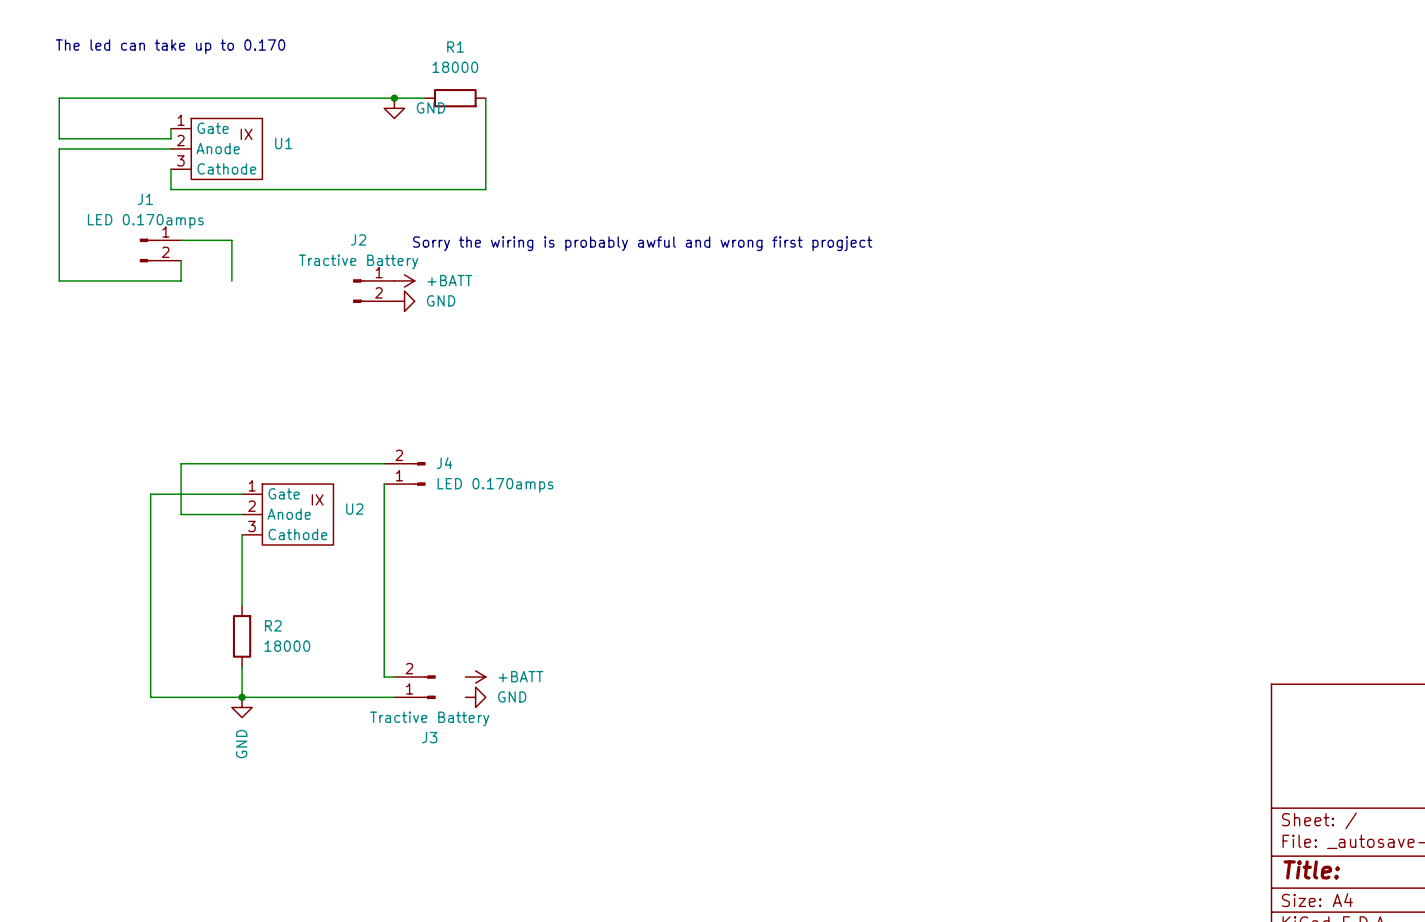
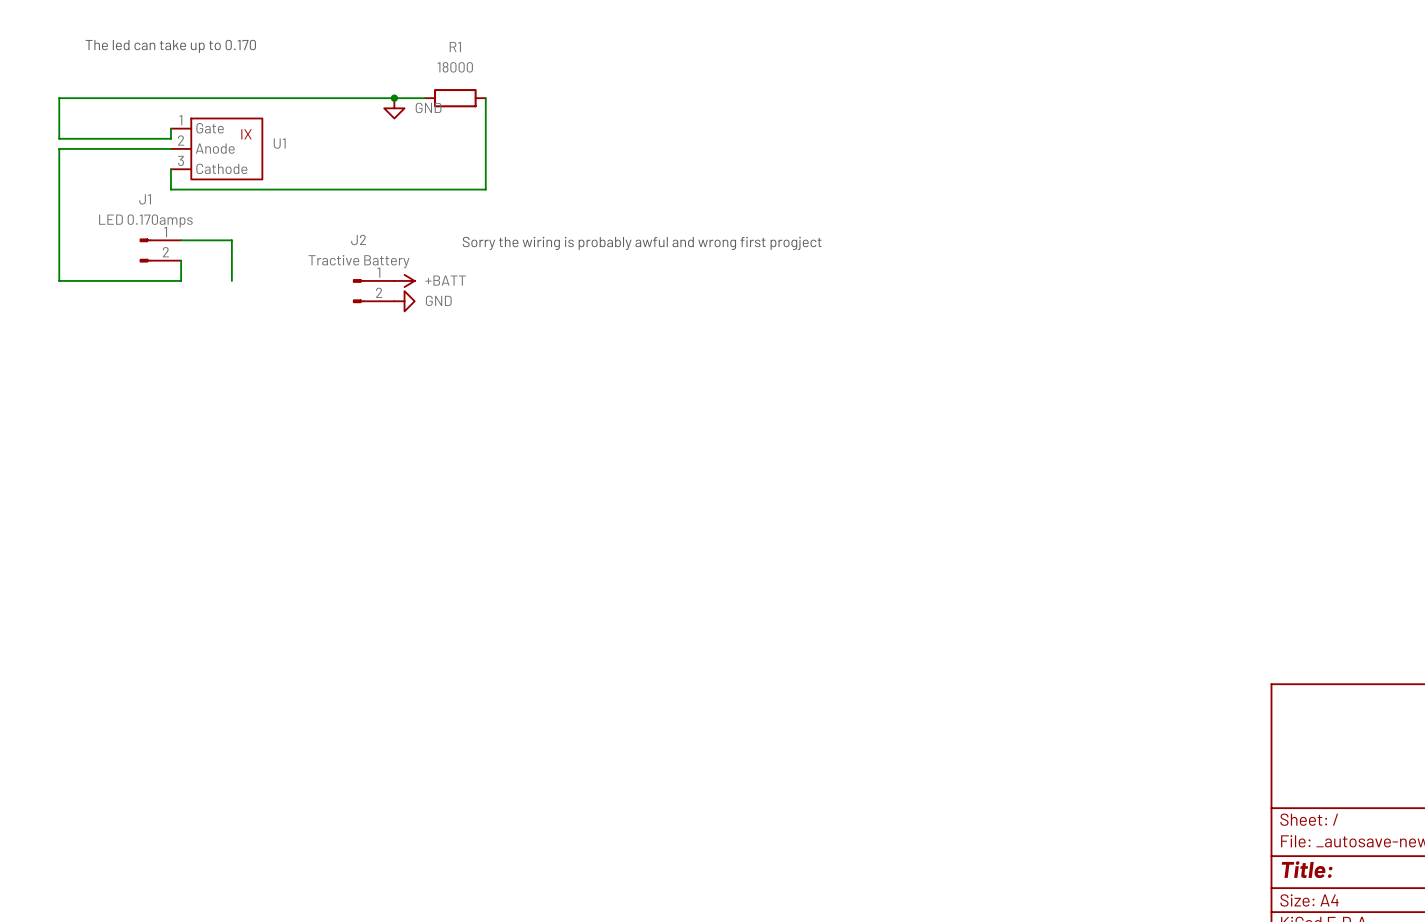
wire: (384, 463) (181, 463) (181, 514) (242, 514) -> none
J4: LED 0.170amps (404, 473) -> none
wire: (384, 484) (384, 677) (394, 677) -> none
wire: (242, 494) (150, 494) (150, 697) (394, 697) -> none
U2: (287, 519) -> none
wire: (242, 534) (242, 605) -> none
R2: 18000 (242, 636) -> none
wire: (242, 666) (242, 697) -> none
power symbol: +BATT (475, 677) -> none
J3: Tractive Battery (414, 687) -> none
junction: (242, 697) -> none
power symbol: GND (475, 697) -> none
power symbol: GND (242, 707) -> none

